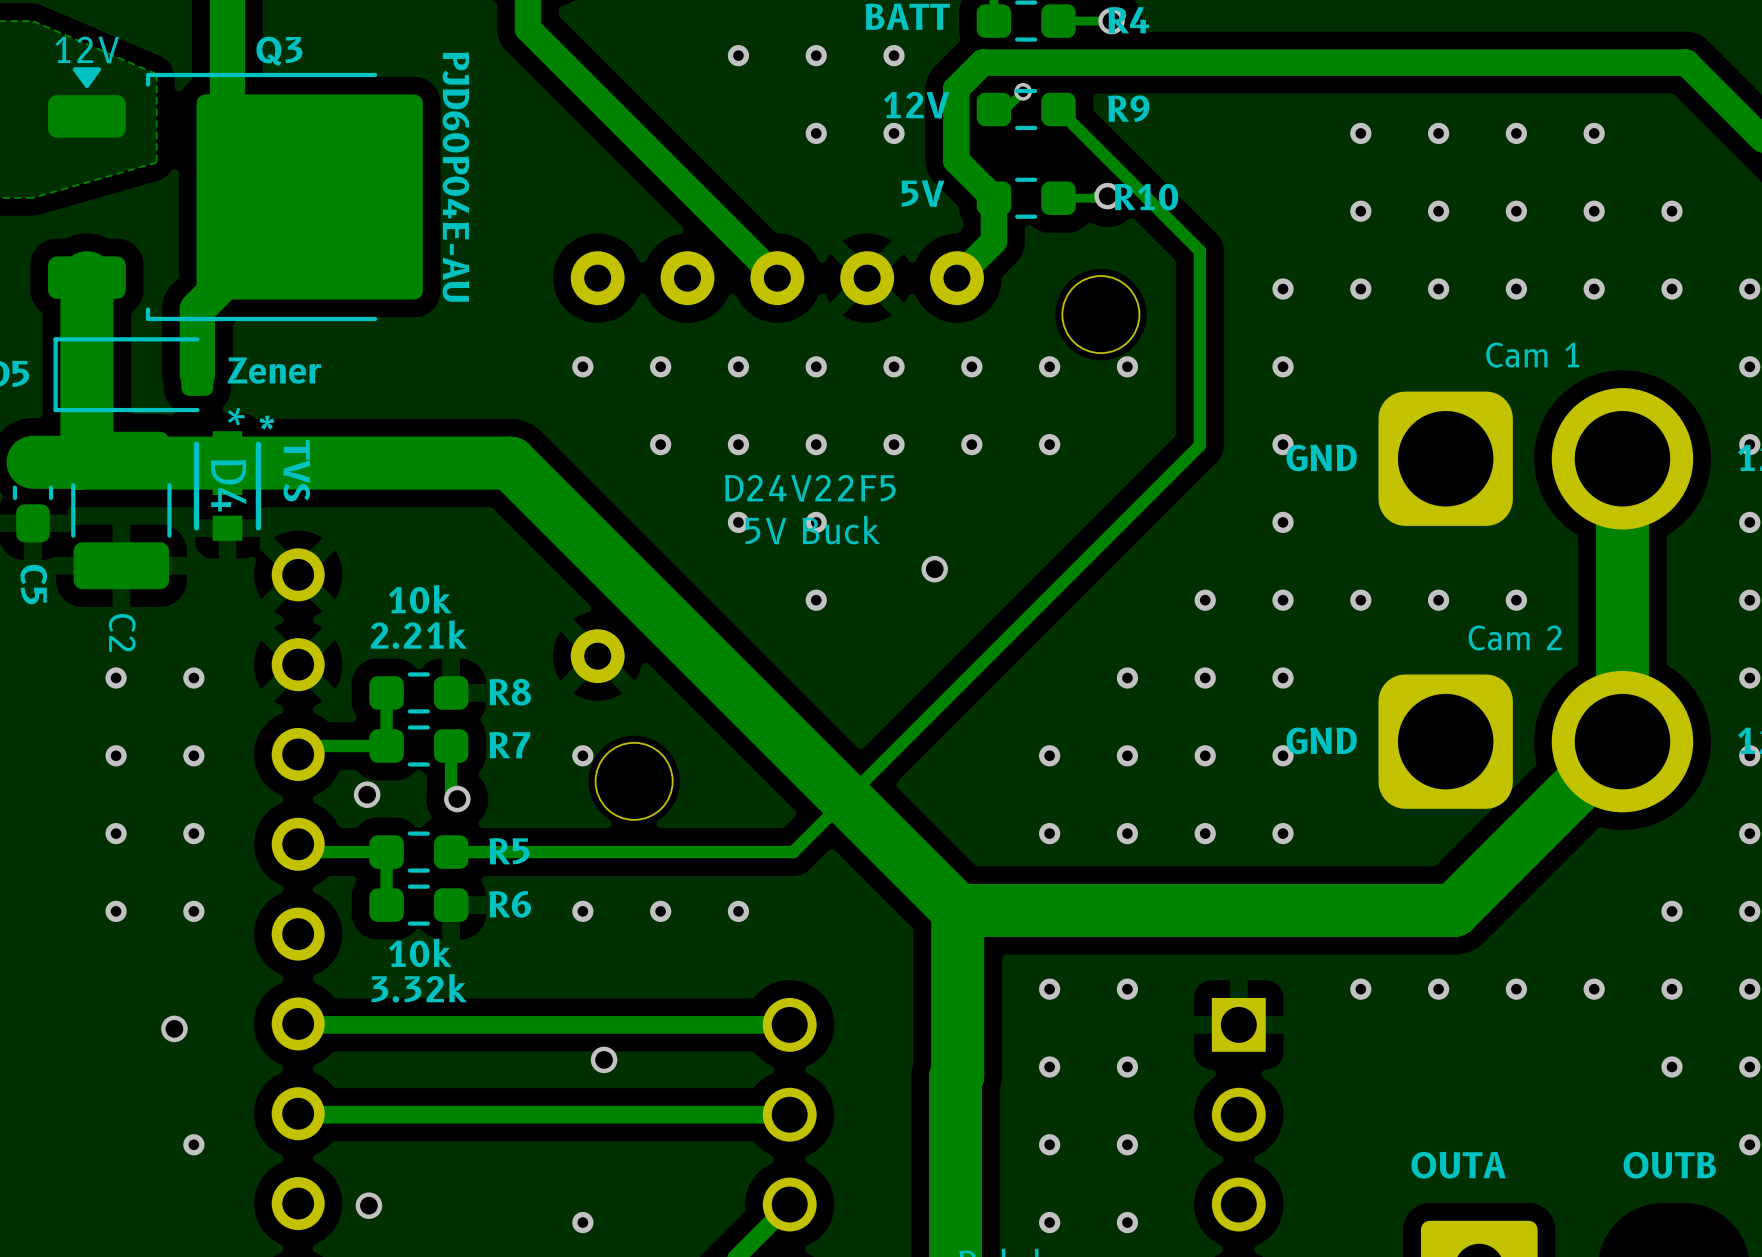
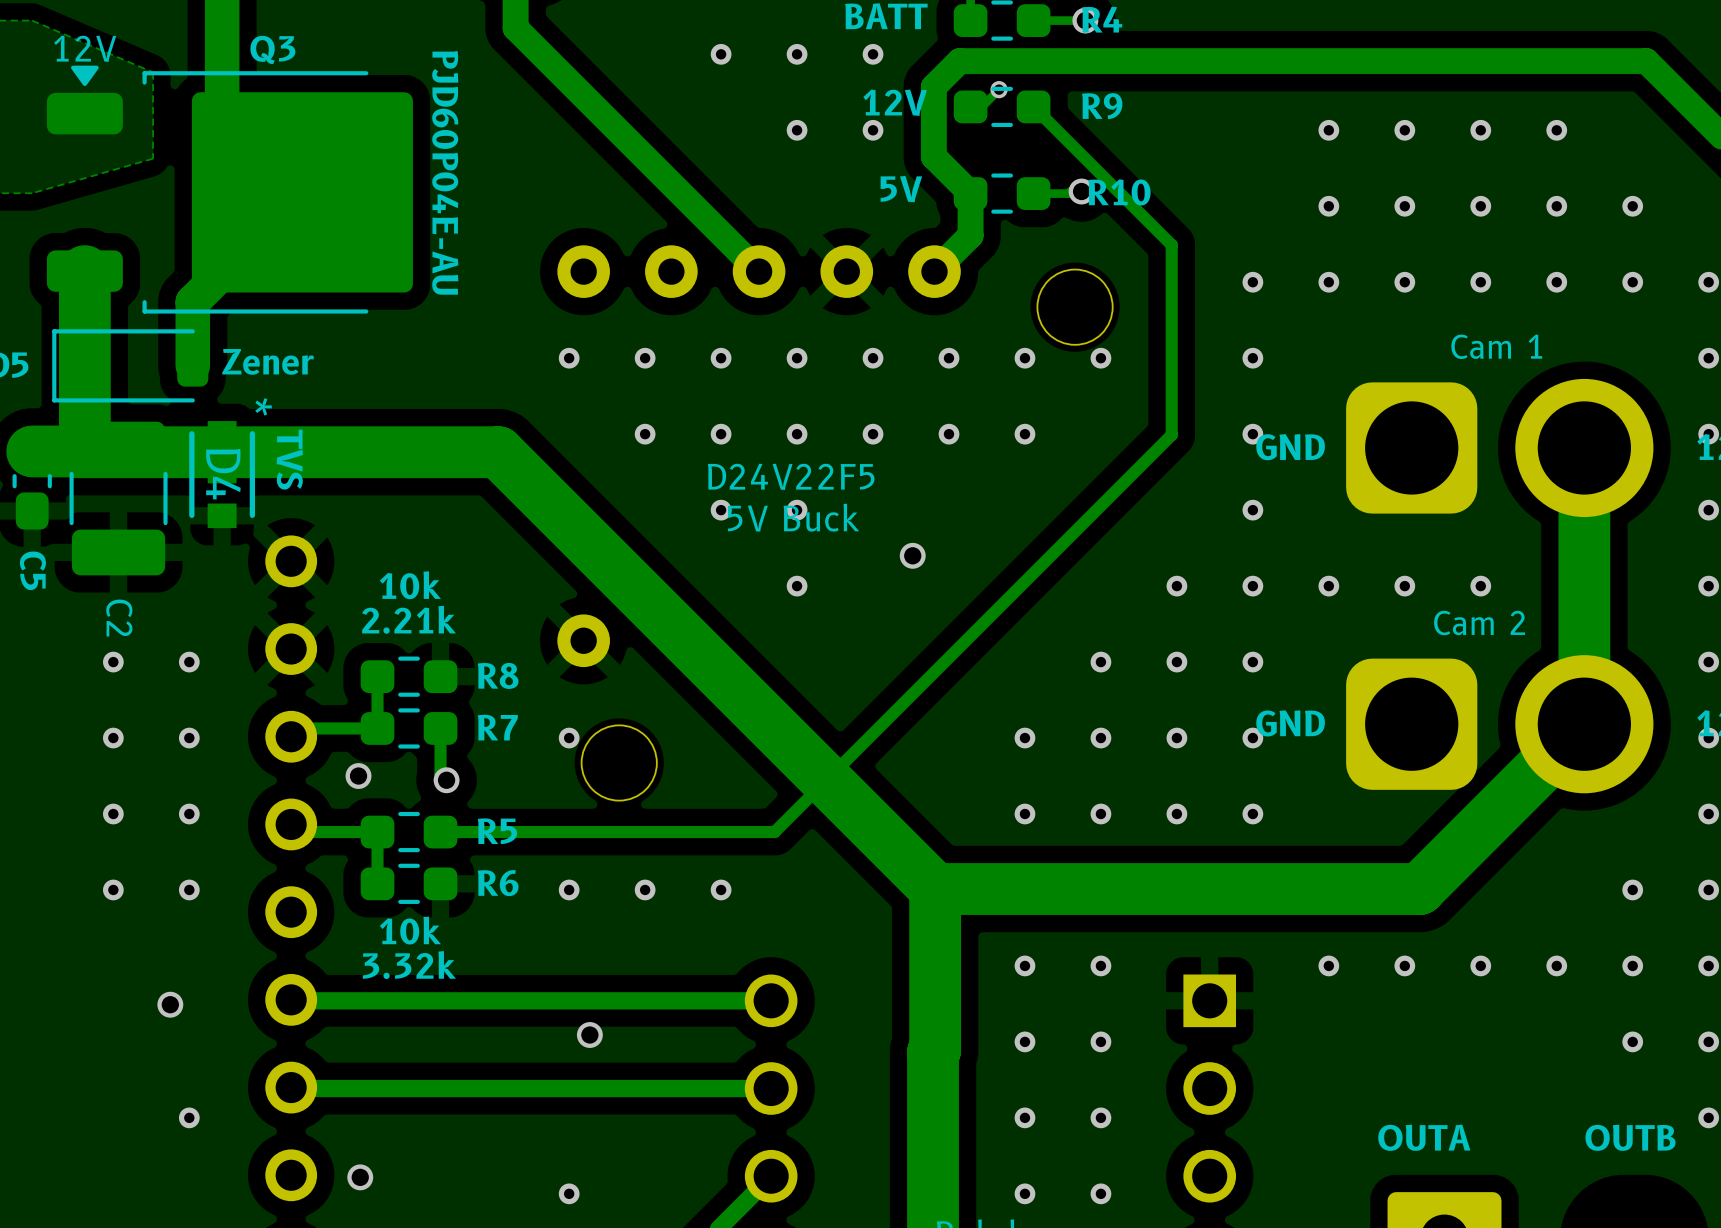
D4 text position: * (236, 416) -> * (263, 406)
text: * (267, 422) -> none

